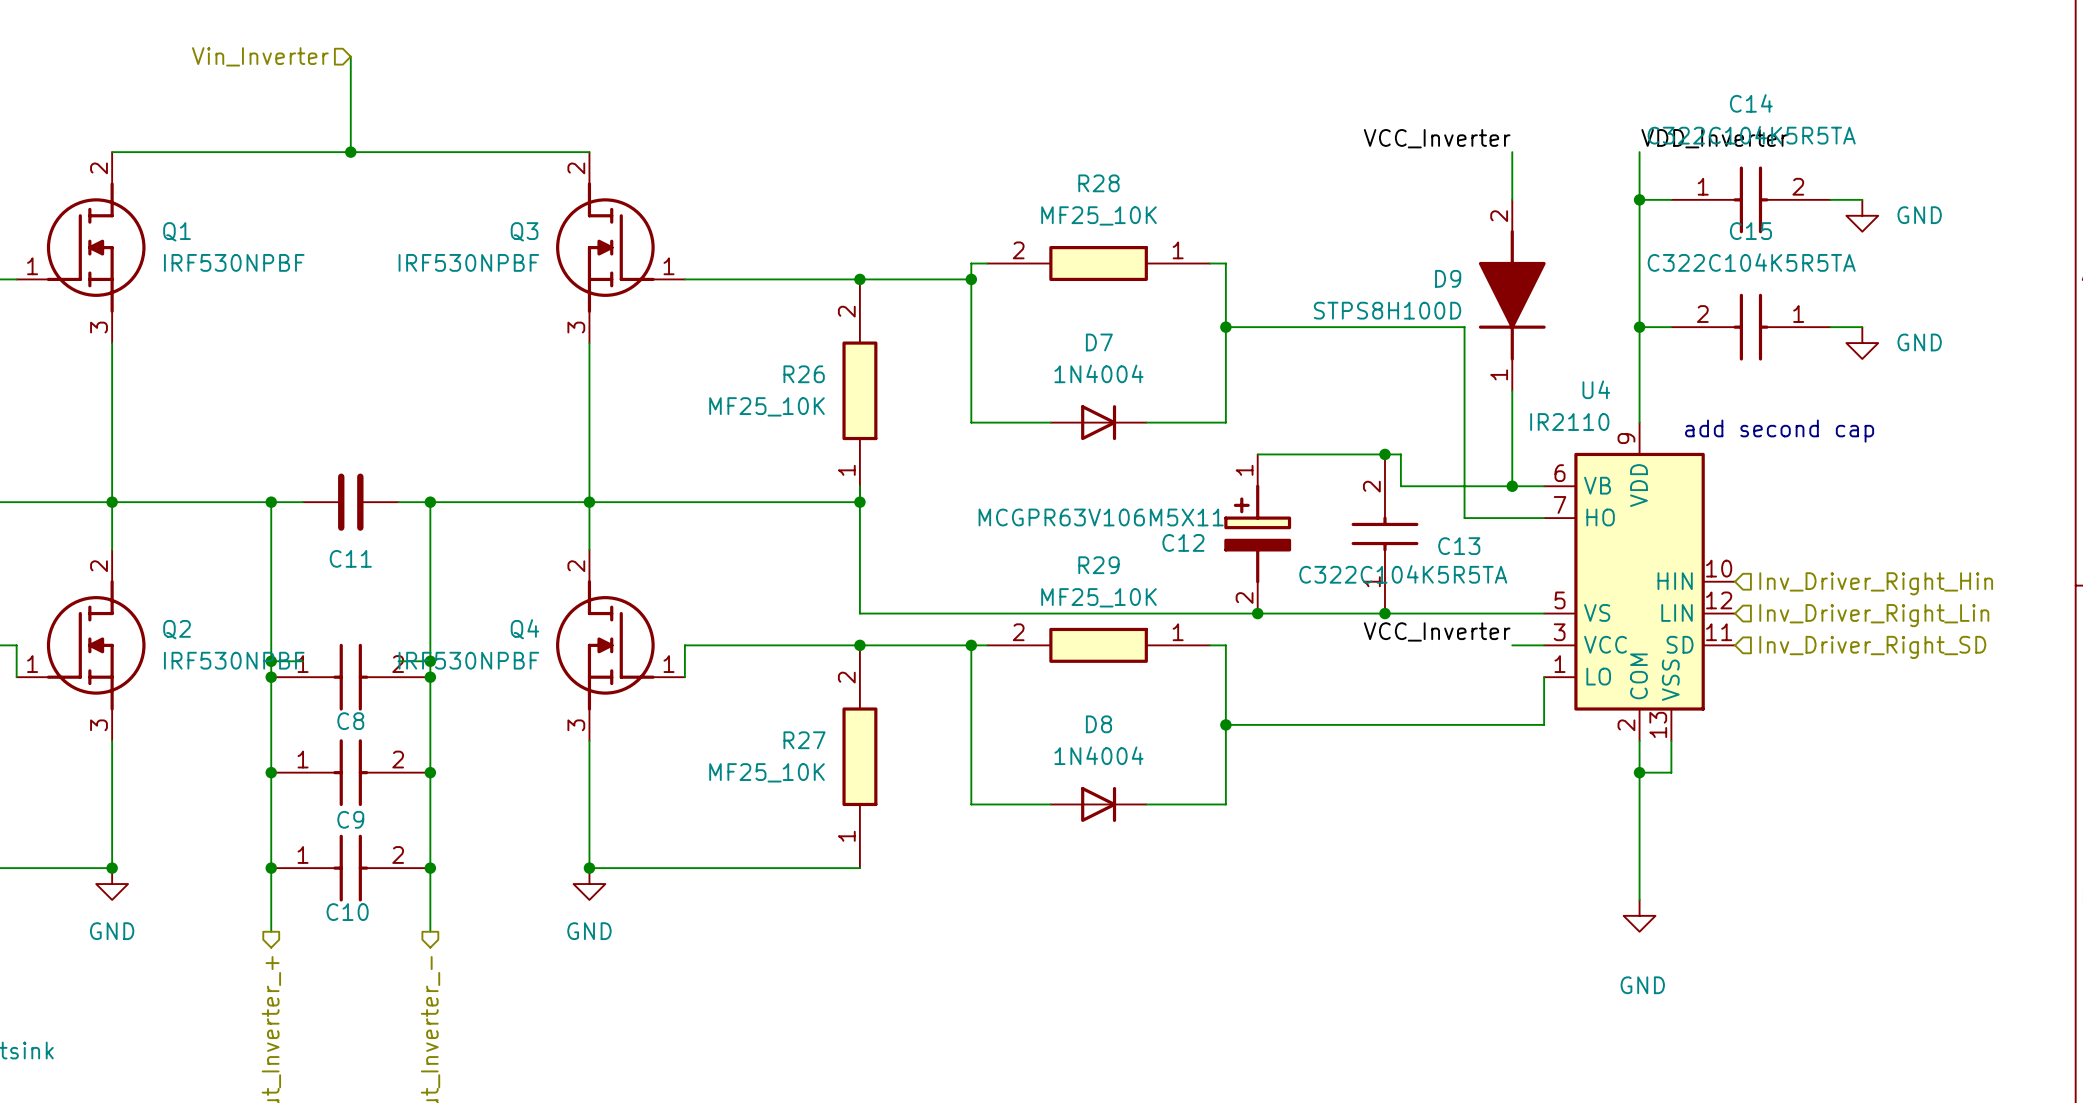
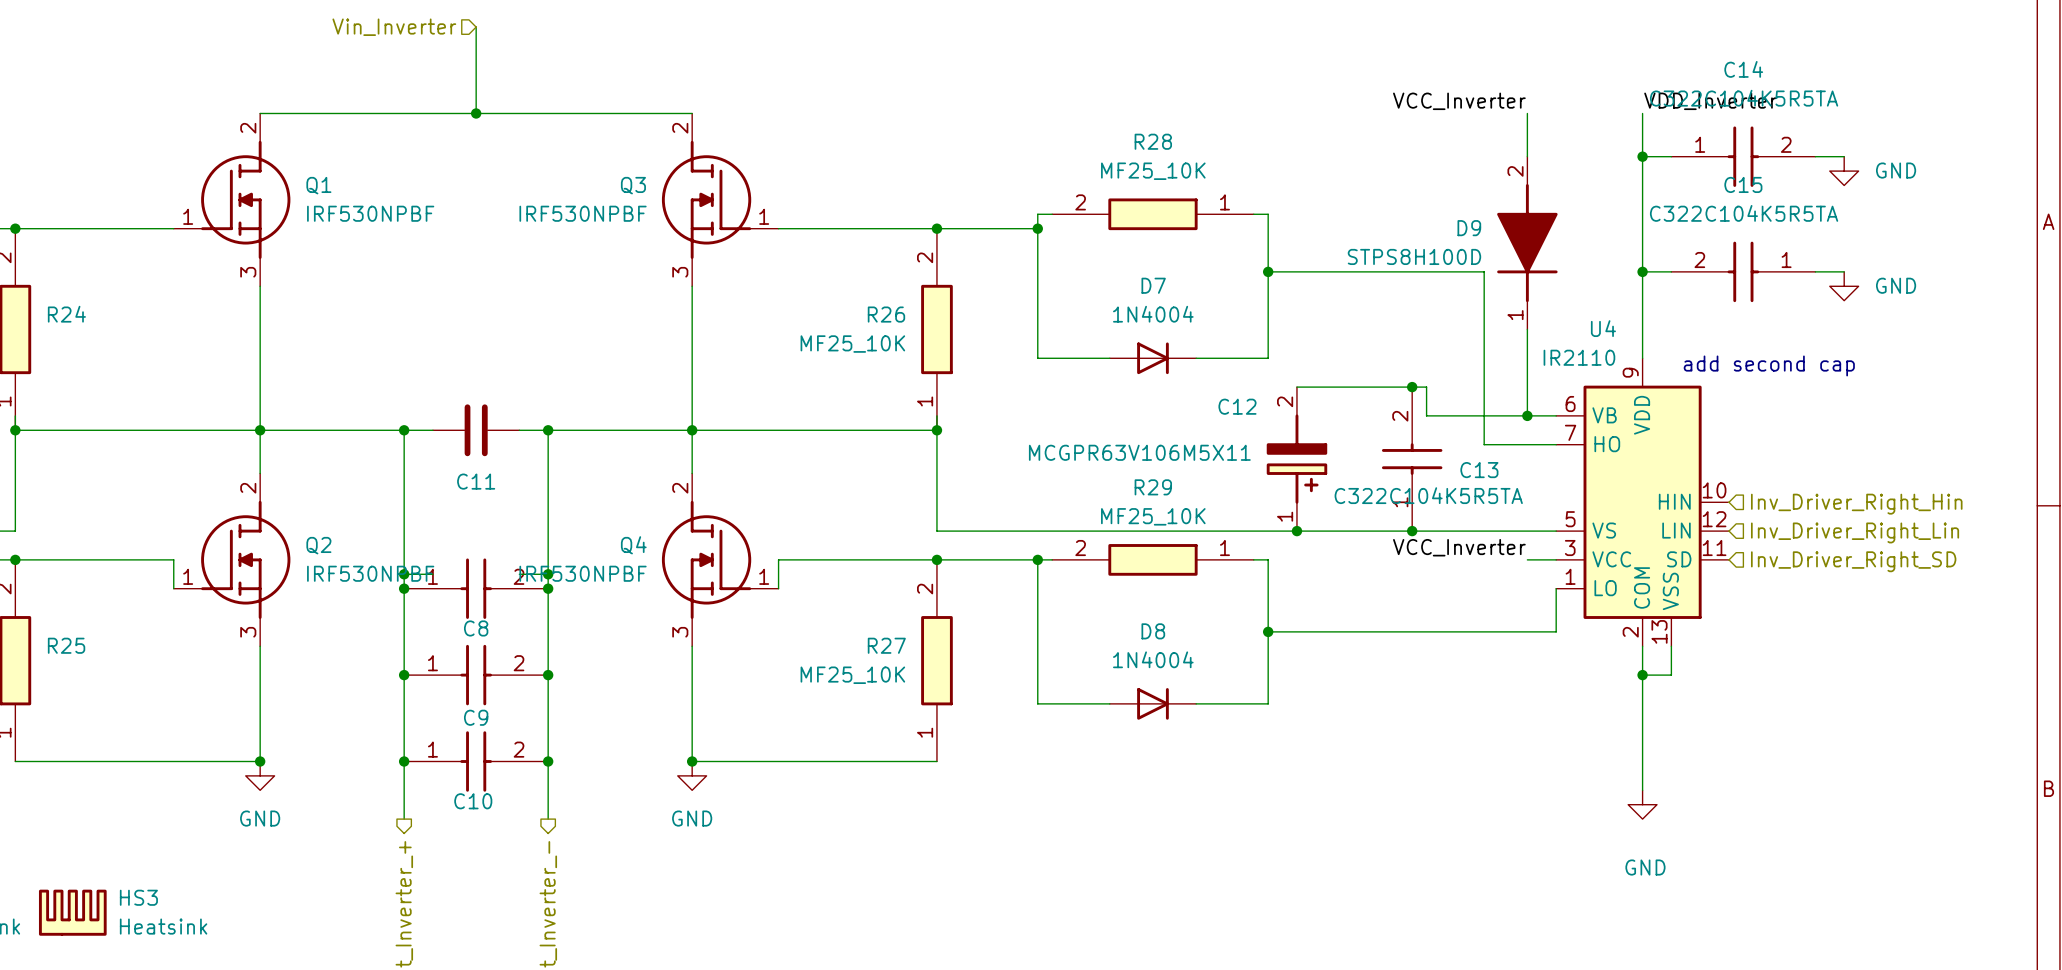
C12 value position: MCGPR63V106M5X11 (1101, 517) -> MCGPR63V106M5X11 (1139, 452)
C12 rotation: 0° (1257, 533) -> 180° (1296, 459)
C12 name position: C12 (1183, 542) -> C12 (1237, 406)

